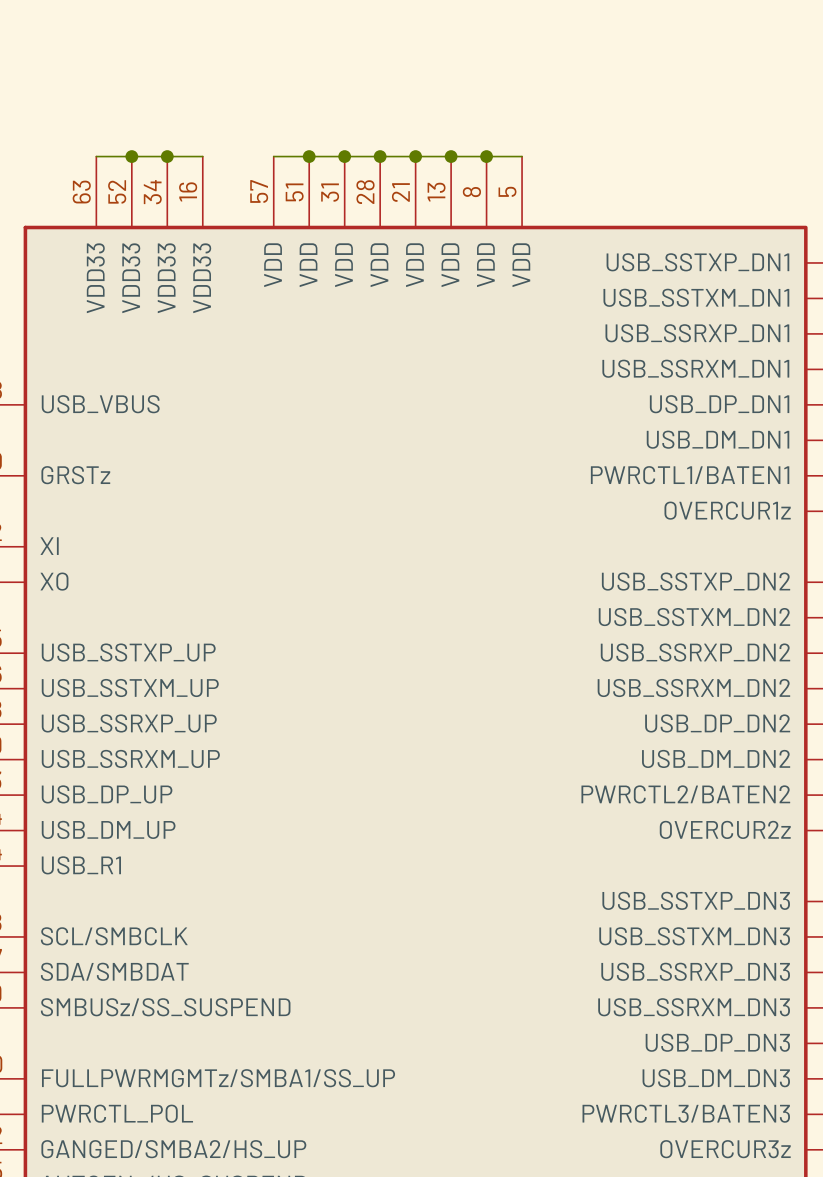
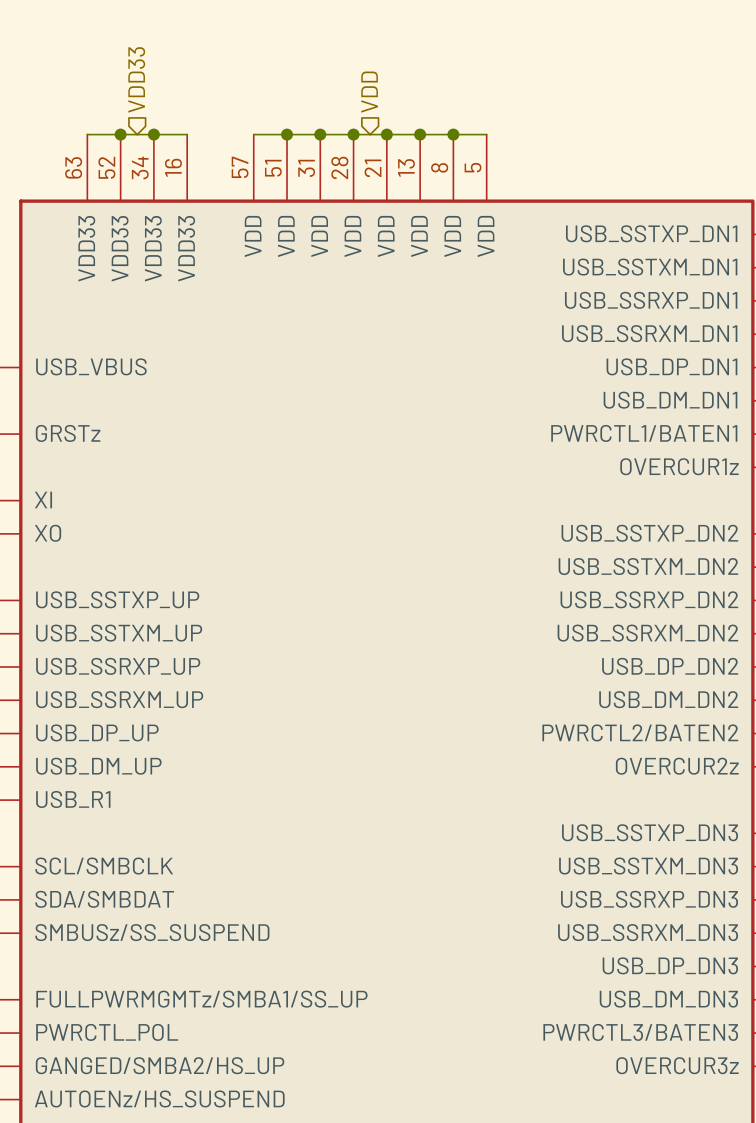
hierarchical label: none -> VDD33 (136, 79)
hierarchical label: none -> VDD (369, 92)

